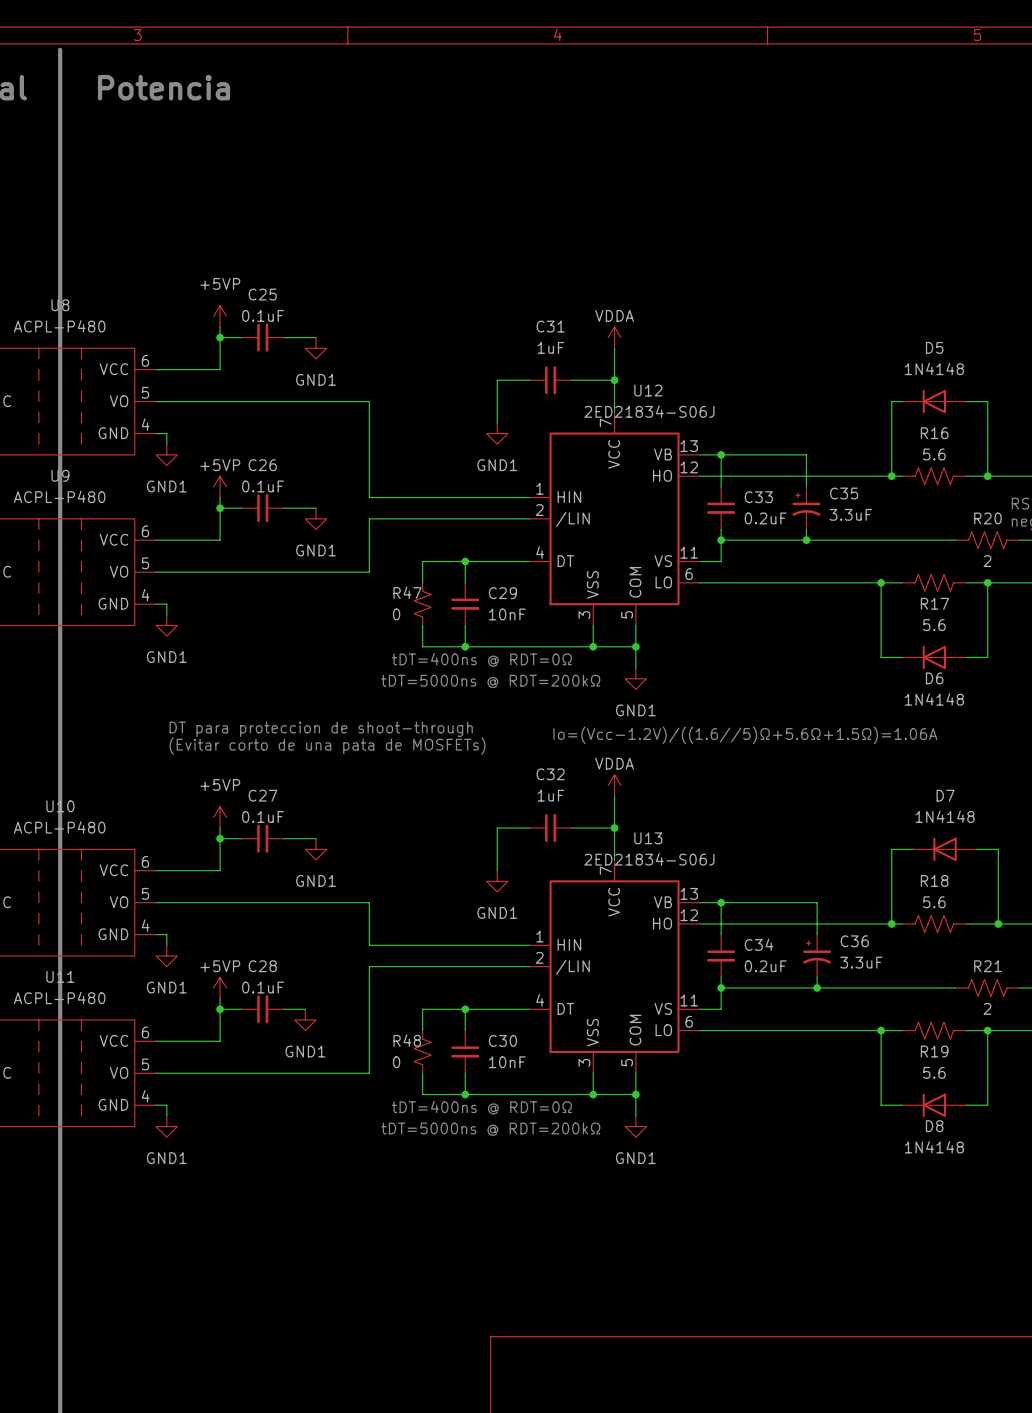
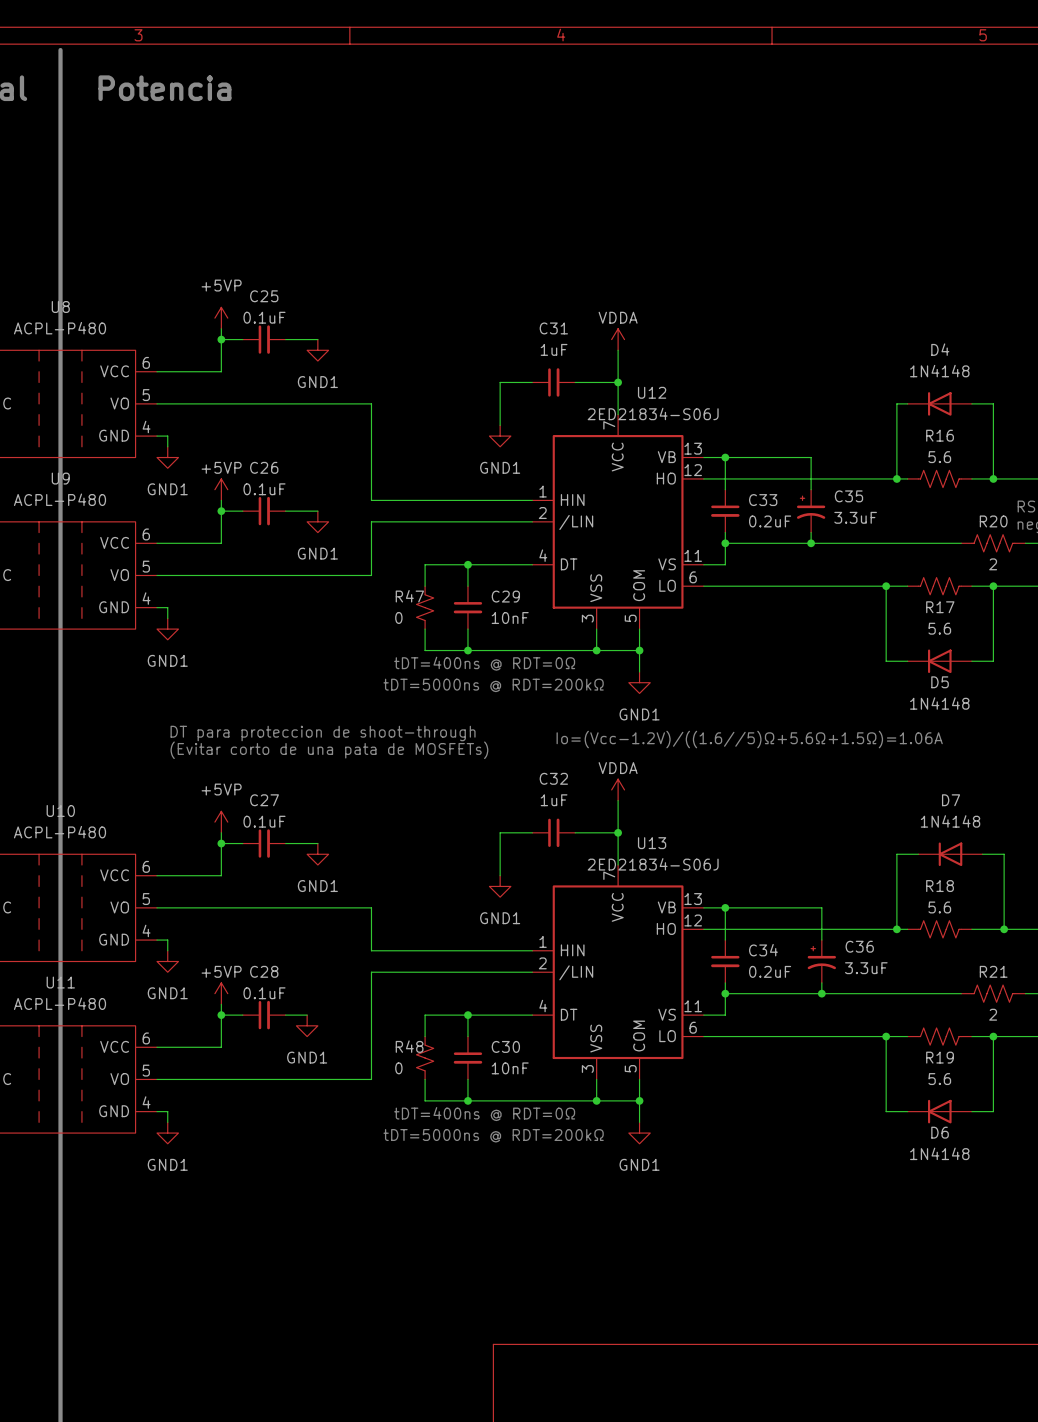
D5 name: D5 (934, 347) -> D4 (940, 349)
D6 name: D6 (934, 678) -> D5 (940, 682)
D8 name: D8 (934, 1126) -> D6 (940, 1132)

